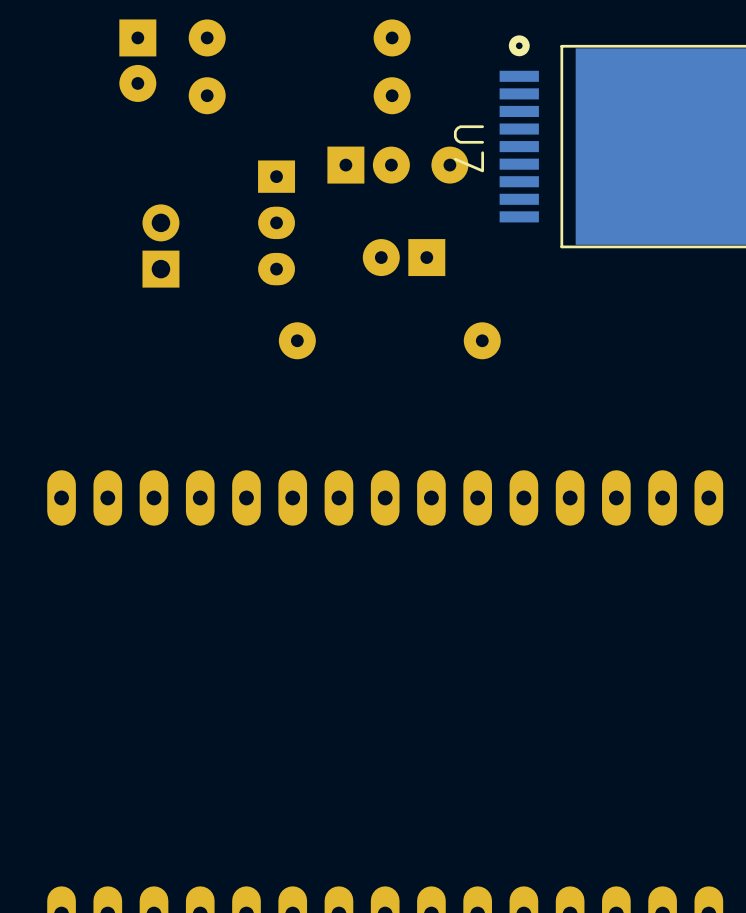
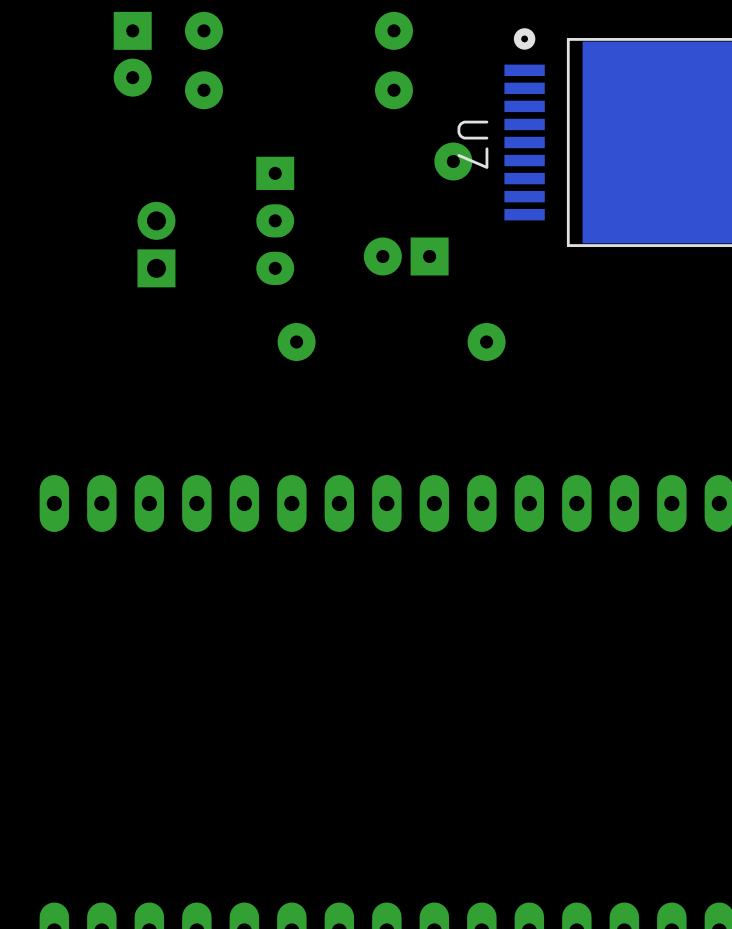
part: (368, 165) -> none

